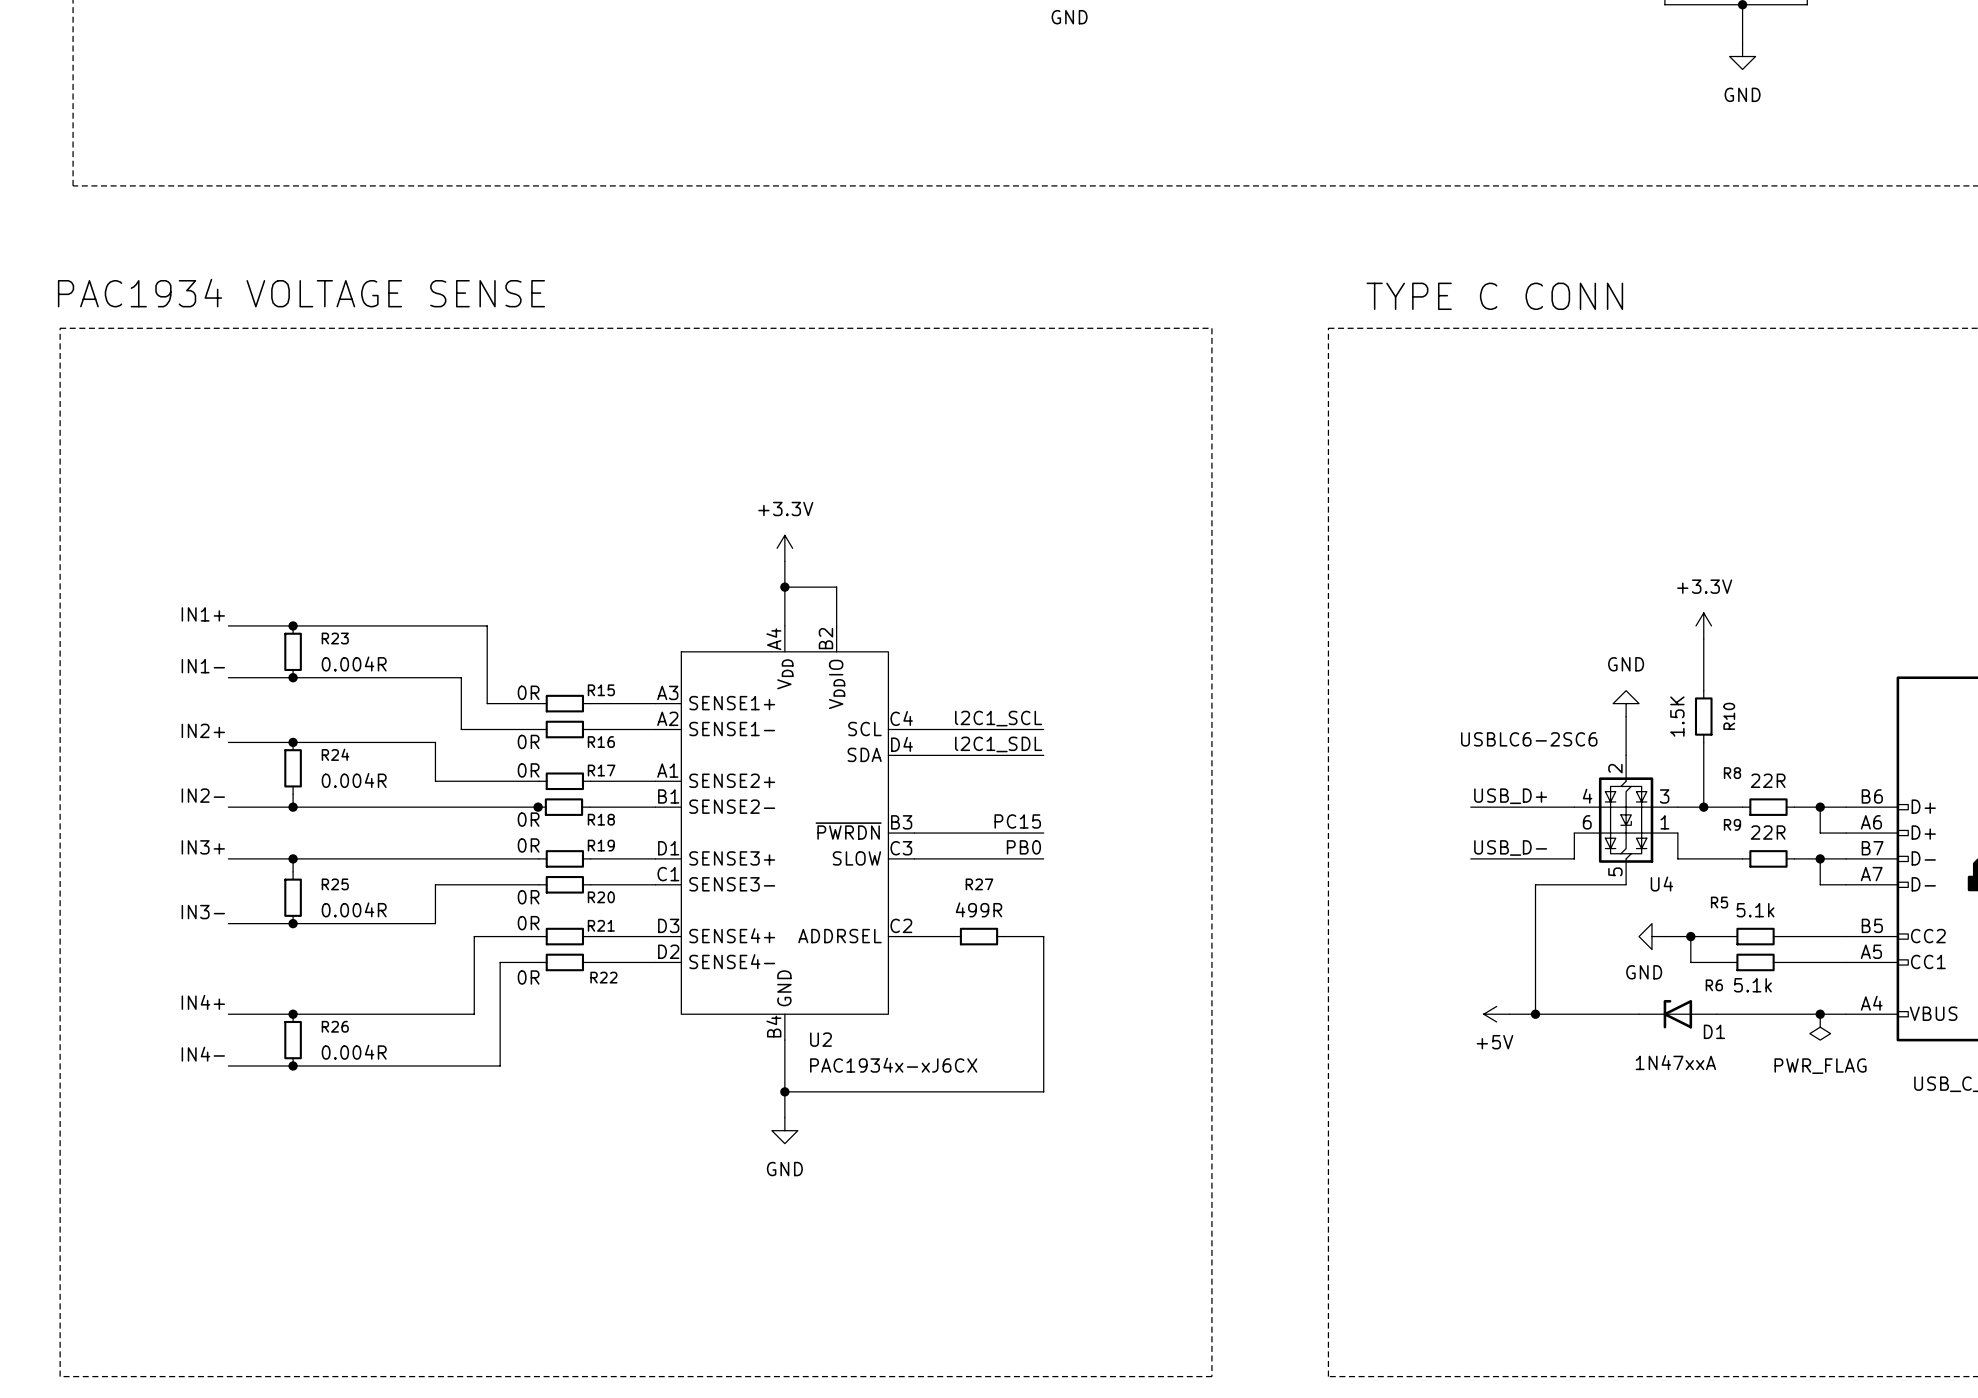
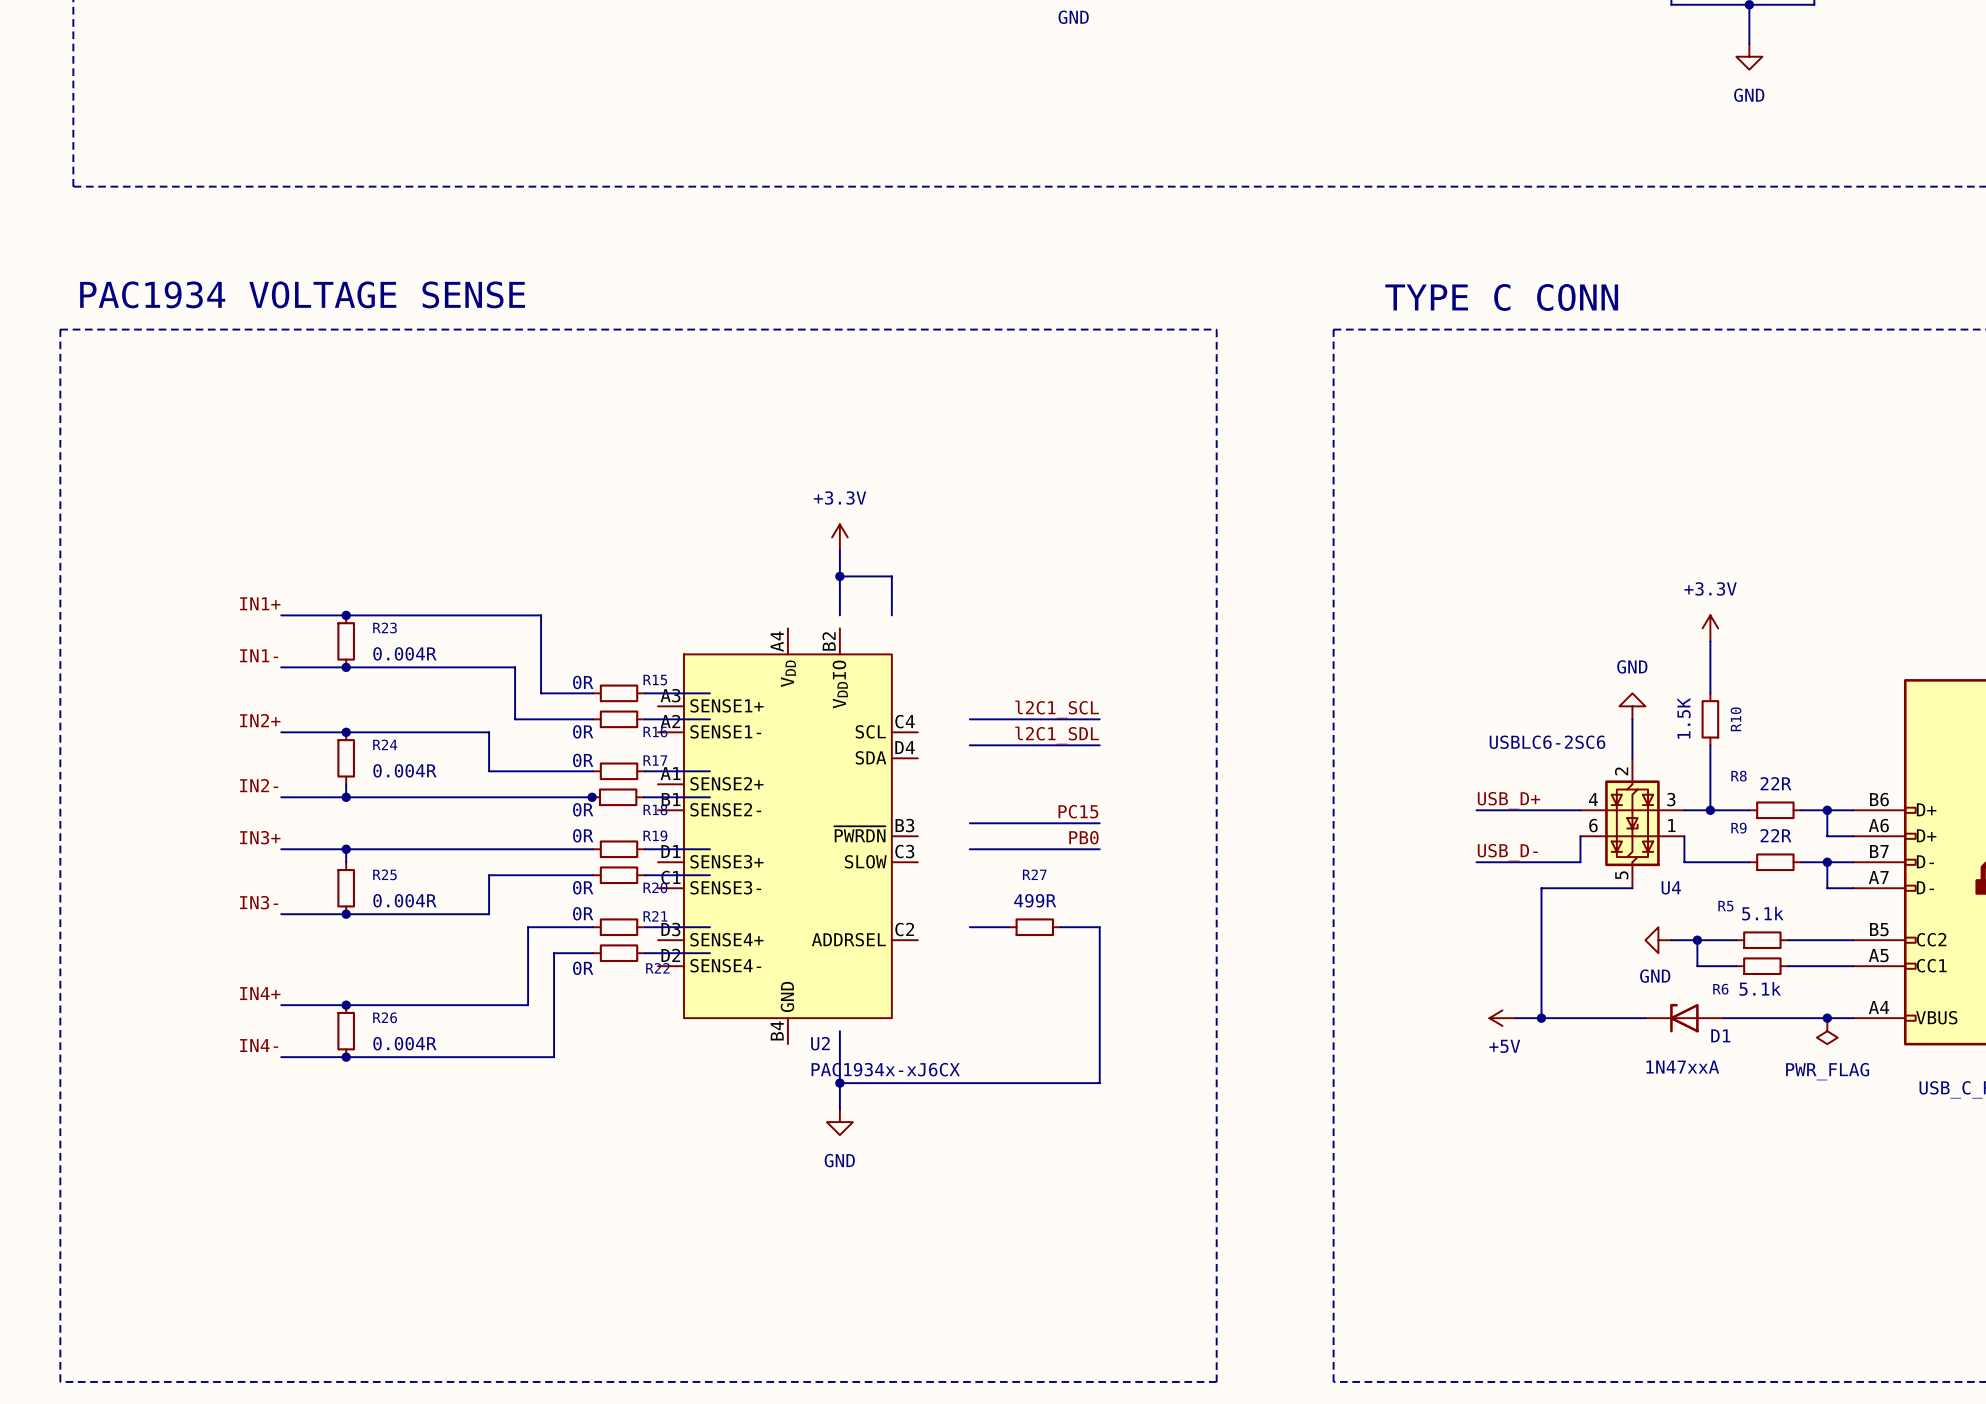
power symbol position: +3.3V (784, 548) -> +3.3V (839, 537)
wire: (784, 561) (784, 625) -> none
wire: none -> (839, 576) (891, 576) (891, 615)
wire: (784, 587) (836, 587) -> (839, 550) (839, 589)
junction position: (784, 587) -> (839, 576)
junction: none -> (346, 615)
wire: (836, 613) (836, 625) -> none
label position: IN1+ (203, 614) -> IN1+ (260, 603)
wire: (228, 625) (487, 625) (487, 703) (538, 703) -> (281, 615) (541, 615) (541, 693) (593, 693)
junction: (293, 625) -> none
R23 position: (293, 651) -> (346, 641)
wire: none -> (281, 667) (515, 667) (515, 719) (593, 719)
junction: none -> (346, 667)
label position: IN1- (203, 666) -> IN1- (259, 655)
wire: (228, 677) (461, 677) (461, 729) -> (281, 732) (463, 732)
junction: (293, 677) -> none
R15 position: (564, 703) -> (619, 693)
wire: (590, 703) (655, 703) -> (645, 693) (709, 693)
label position: l2C1_SCL (998, 718) -> l2C1_SCL (1057, 709)
junction: none -> (346, 732)
wire: (487, 729) (538, 729) -> (489, 732) (489, 771) (593, 771)
R16 position: (564, 729) -> (619, 719)
wire: (590, 729) (655, 729) -> (645, 719) (709, 719)
wire: (914, 729) (1043, 729) -> (969, 719) (1099, 719)
label position: IN2+ (203, 730) -> IN2+ (260, 720)
wire: (228, 742) (435, 742) (435, 781) (538, 781) -> none
junction: (293, 742) -> none
label position: l2C1_SDL (998, 744) -> l2C1_SDL (1057, 735)
wire: (914, 755) (1043, 755) -> (969, 745) (1099, 745)
R24 position: (293, 768) -> (346, 758)
R17 position: (564, 781) -> (619, 771)
wire: (590, 781) (655, 781) -> (645, 771) (709, 771)
wire: (293, 794) (293, 807) -> (346, 784) (346, 797)
junction: none -> (346, 797)
label position: IN2- (203, 795) -> IN2- (259, 785)
wire: (228, 807) (538, 807) -> (281, 797) (593, 797)
junction: (293, 807) -> none
junction position: (538, 807) -> (592, 797)
R18 position: (563, 807) -> (618, 797)
wire: (589, 807) (655, 807) -> (644, 797) (709, 797)
label position: PC15 (1017, 821) -> PC15 (1078, 811)
wire: (914, 833) (1043, 833) -> (969, 823) (1099, 823)
junction: none -> (346, 849)
label position: IN3+ (203, 847) -> IN3+ (260, 837)
label position: PB0 (1023, 847) -> PB0 (1083, 837)
wire: (228, 858) (538, 858) -> (281, 849) (593, 849)
wire: (293, 858) (293, 871) -> (346, 849) (346, 862)
junction: (293, 858) -> none
R19 position: (564, 858) -> (619, 849)
wire: (590, 858) (655, 858) -> (645, 849) (709, 849)
wire: (914, 858) (1043, 858) -> (969, 849) (1099, 849)
wire: (538, 884) (435, 884) (435, 923) (228, 923) -> (593, 875) (489, 875) (489, 914) (281, 914)
R20 position: (564, 884) -> (619, 875)
wire: (590, 884) (655, 884) -> (645, 875) (709, 875)
R25 position: (293, 897) -> (346, 888)
junction: none -> (346, 914)
label position: IN3- (203, 912) -> IN3- (259, 902)
junction: (293, 923) -> none
wire: (538, 936) (474, 936) (474, 1014) (228, 1014) -> (593, 927) (528, 927) (528, 1005) (281, 1005)
R21 position: (564, 936) -> (619, 927)
wire: (590, 936) (655, 936) -> (645, 927) (709, 927)
wire: (914, 936) (953, 936) -> (969, 927) (1008, 927)
R27 position: (979, 936) -> (1034, 927)
wire: (1004, 936) (1043, 936) (1043, 1091) (784, 1091) -> (1060, 927) (1099, 927) (1099, 1083) (839, 1083)
wire: (538, 962) (500, 962) (500, 1065) (228, 1065) -> (593, 953) (554, 953) (554, 1057) (281, 1057)
R22 position: (564, 962) -> (619, 953)
wire: (590, 962) (655, 962) -> (645, 953) (709, 953)
junction: none -> (346, 1005)
label position: IN4+ (203, 1002) -> IN4+ (260, 993)
junction: (293, 1014) -> none
R26 position: (293, 1040) -> (346, 1031)
wire: (784, 1040) (784, 1117) -> (839, 1031) (839, 1109)
junction: none -> (346, 1057)
label position: IN4- (203, 1054) -> IN4- (259, 1045)
junction: (293, 1065) -> none
junction position: (784, 1091) -> (839, 1083)
power symbol position: GND (784, 1130) -> GND (839, 1122)

